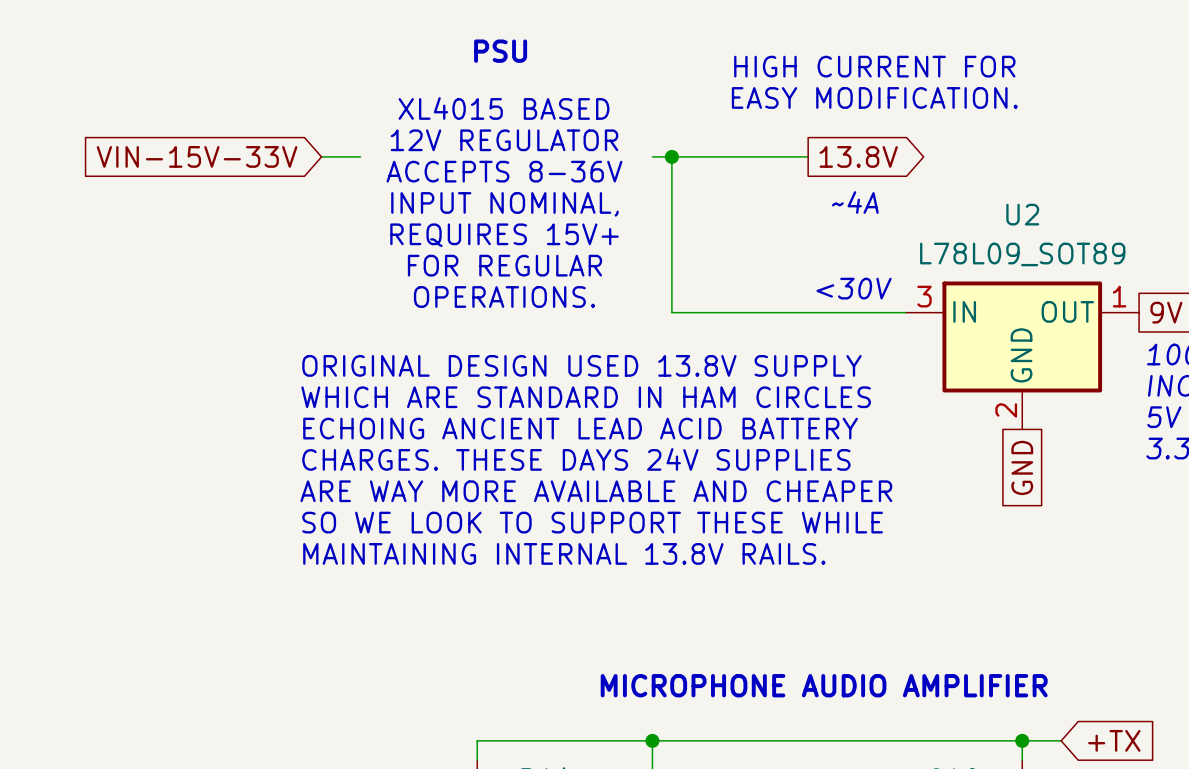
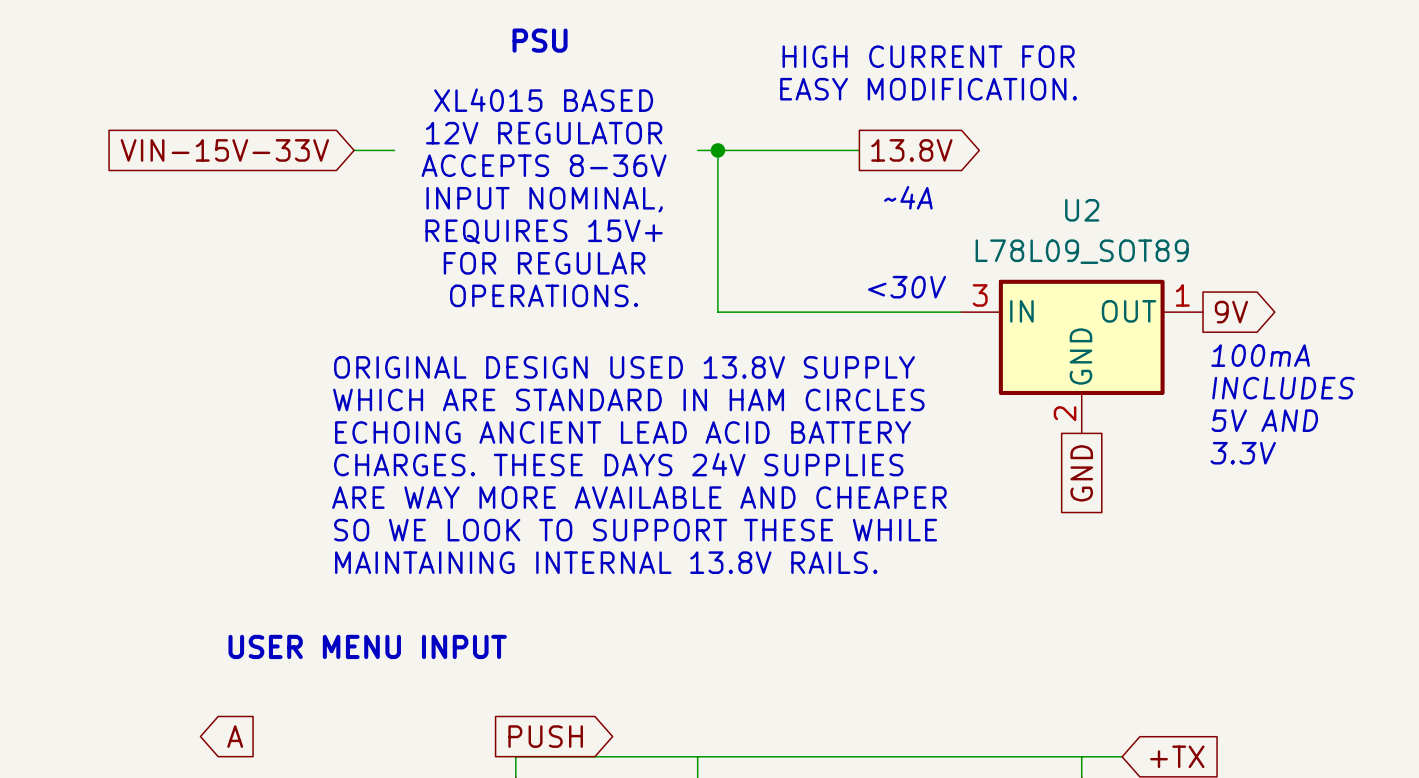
text: none -> USER MENU INPUT (367, 646)
text: MICROPHONE AUDIO AMPLIFIER (824, 685) -> none
global label: none -> A (235, 736)
global label: none -> PUSH (545, 736)
junction: (652, 740) -> none
junction: (1022, 740) -> none

